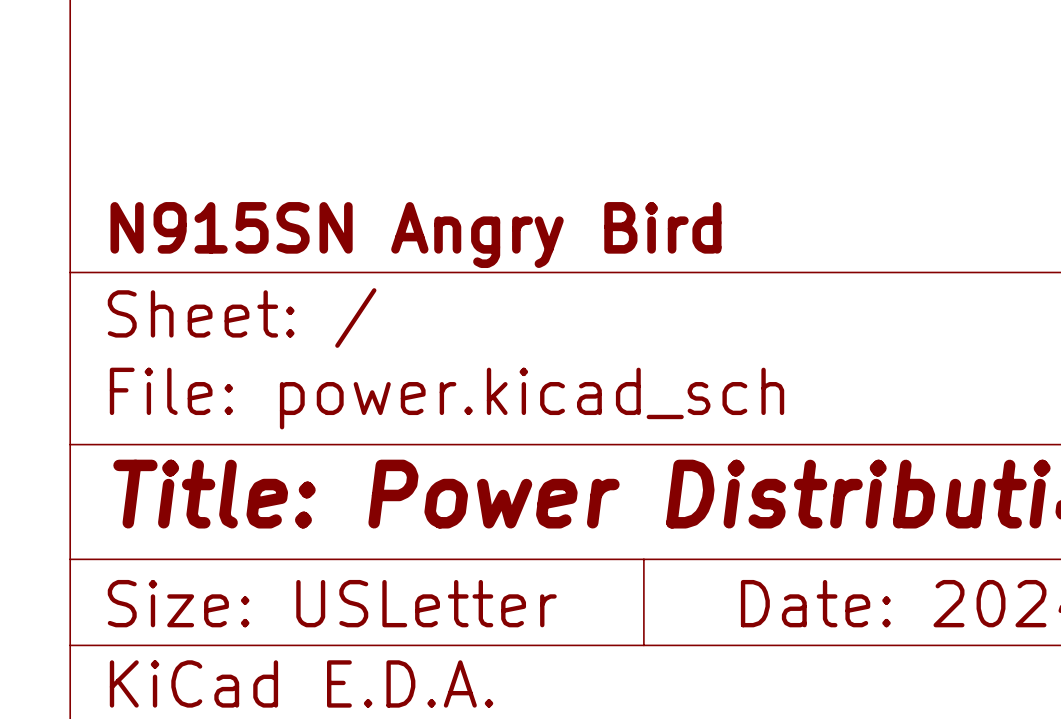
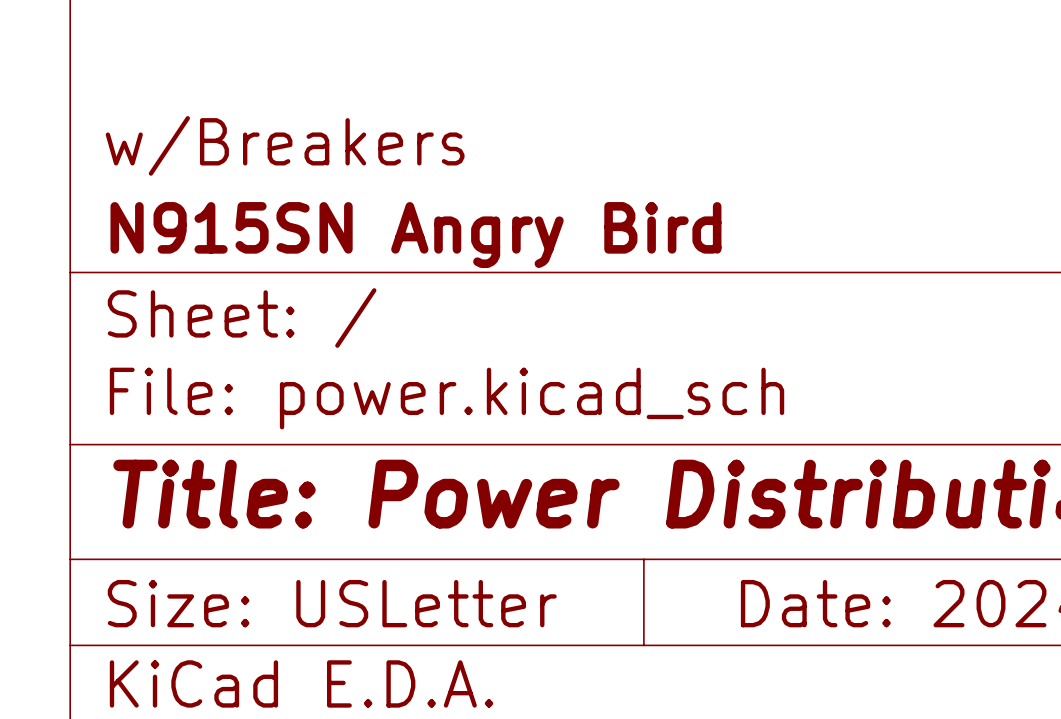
title block: none -> w/Breakers (285, 145)

